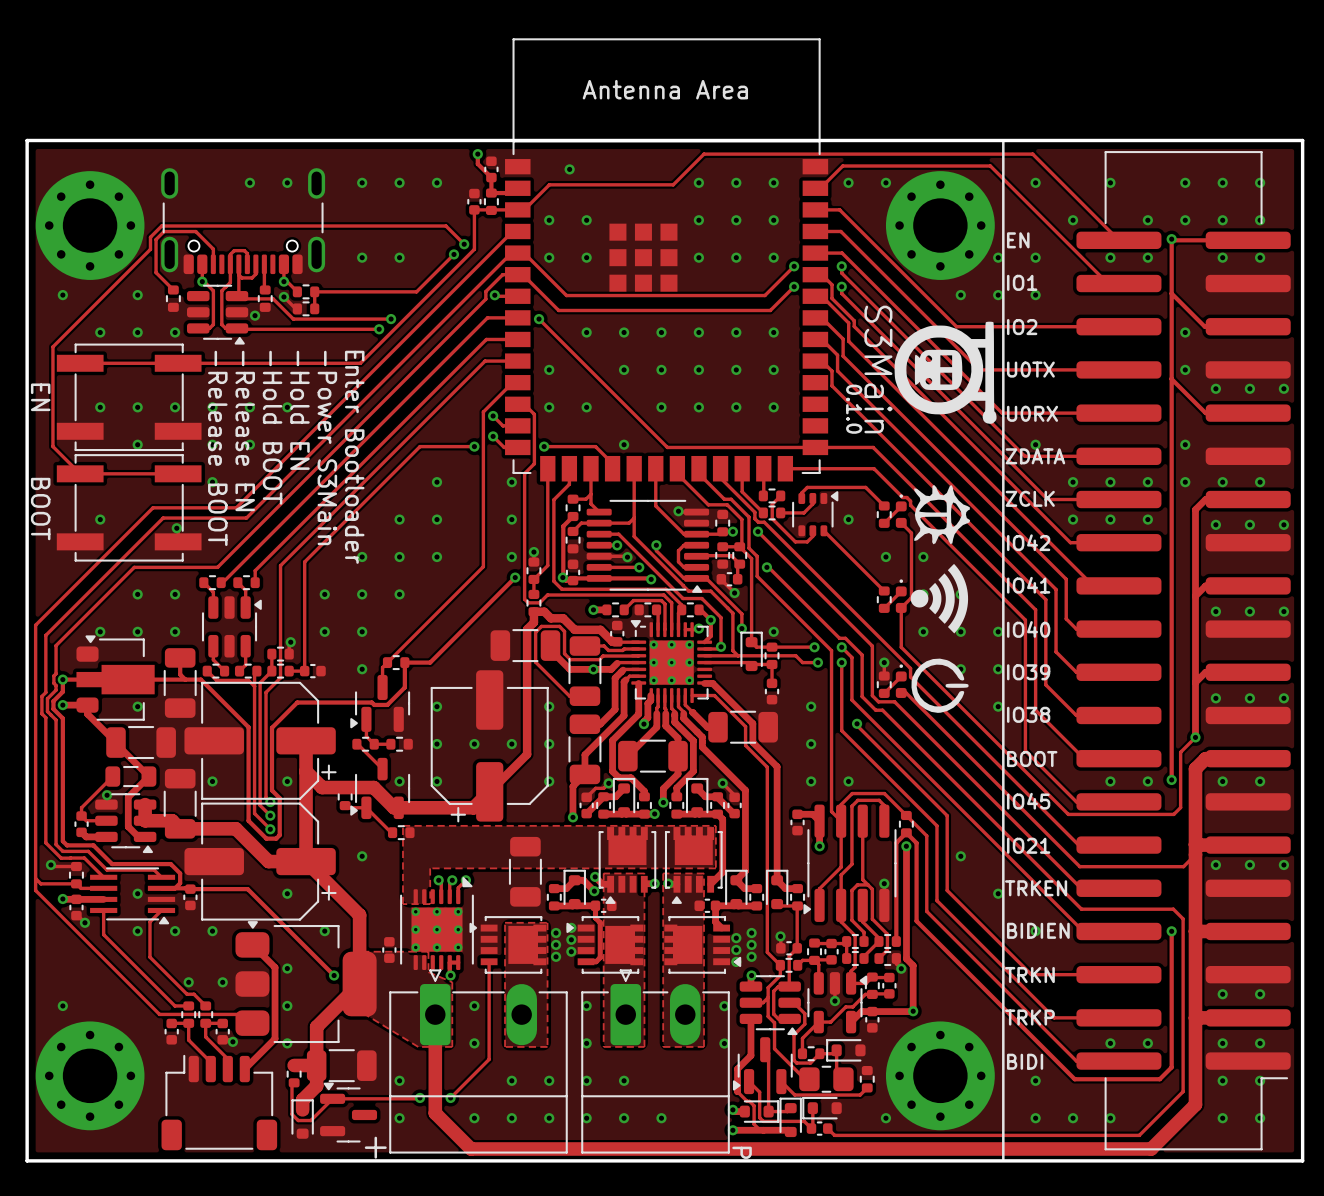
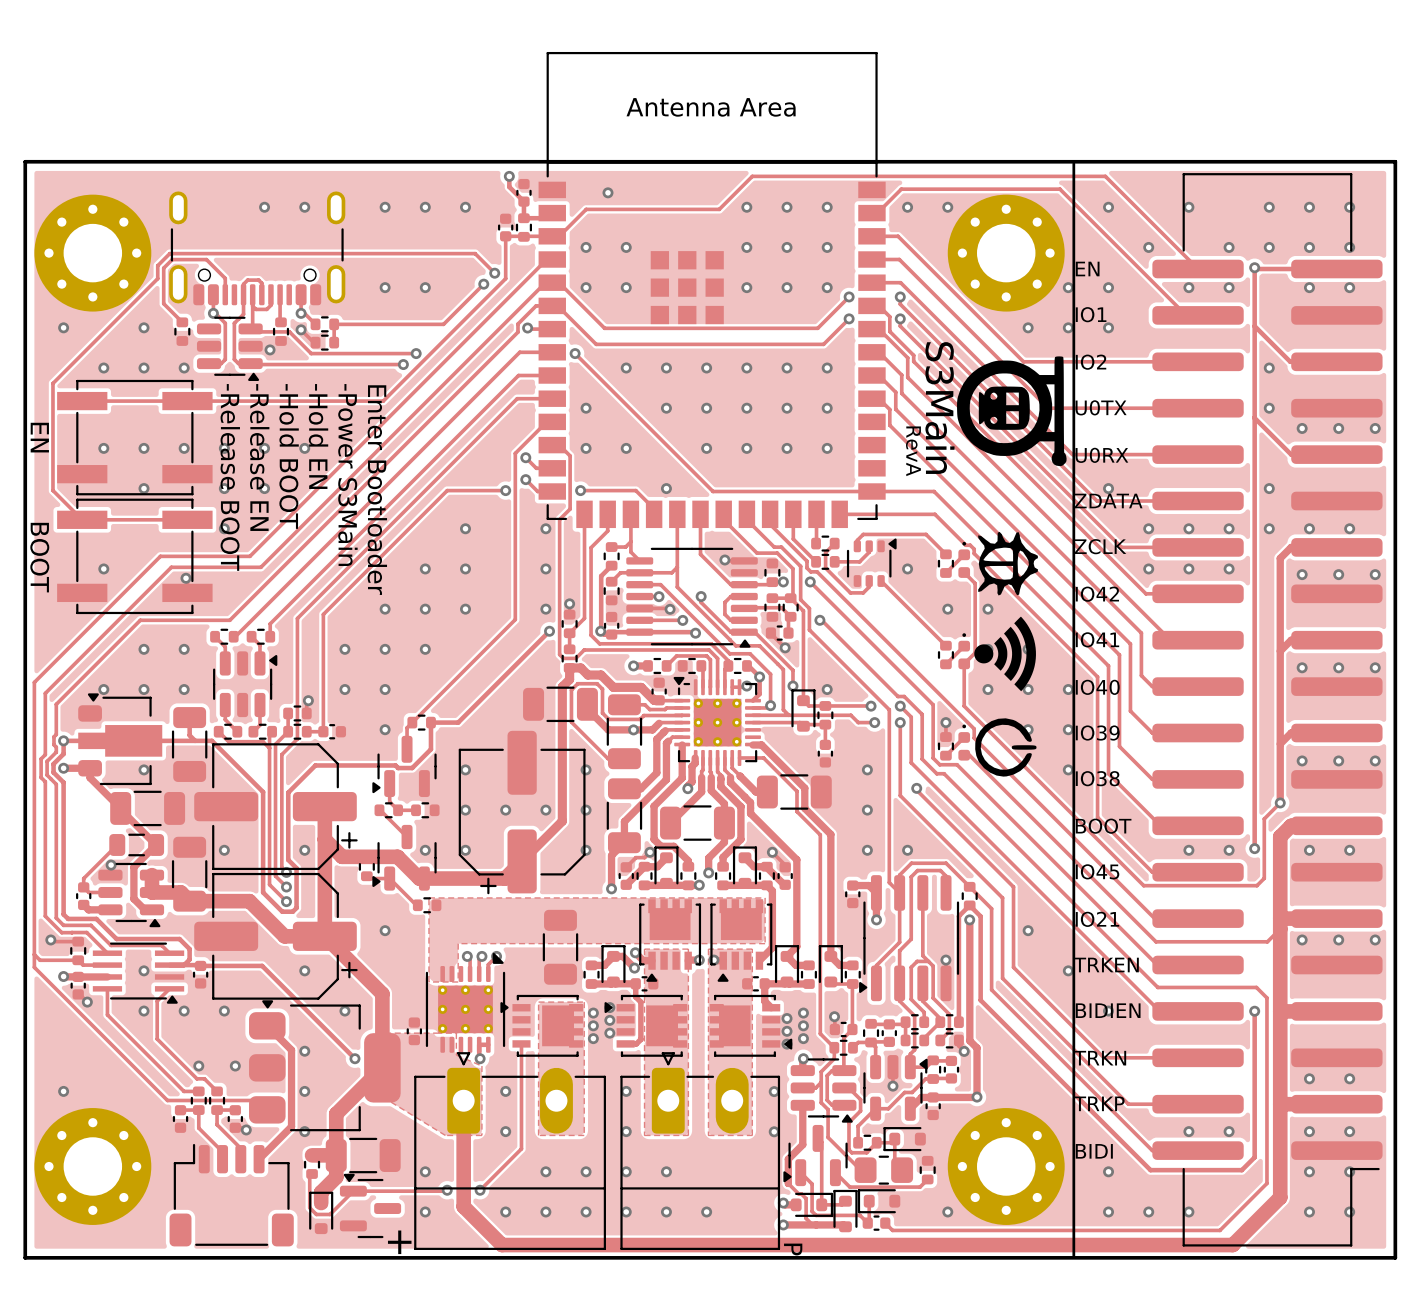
text: 0.1.0 (854, 409) -> RevA (913, 451)

